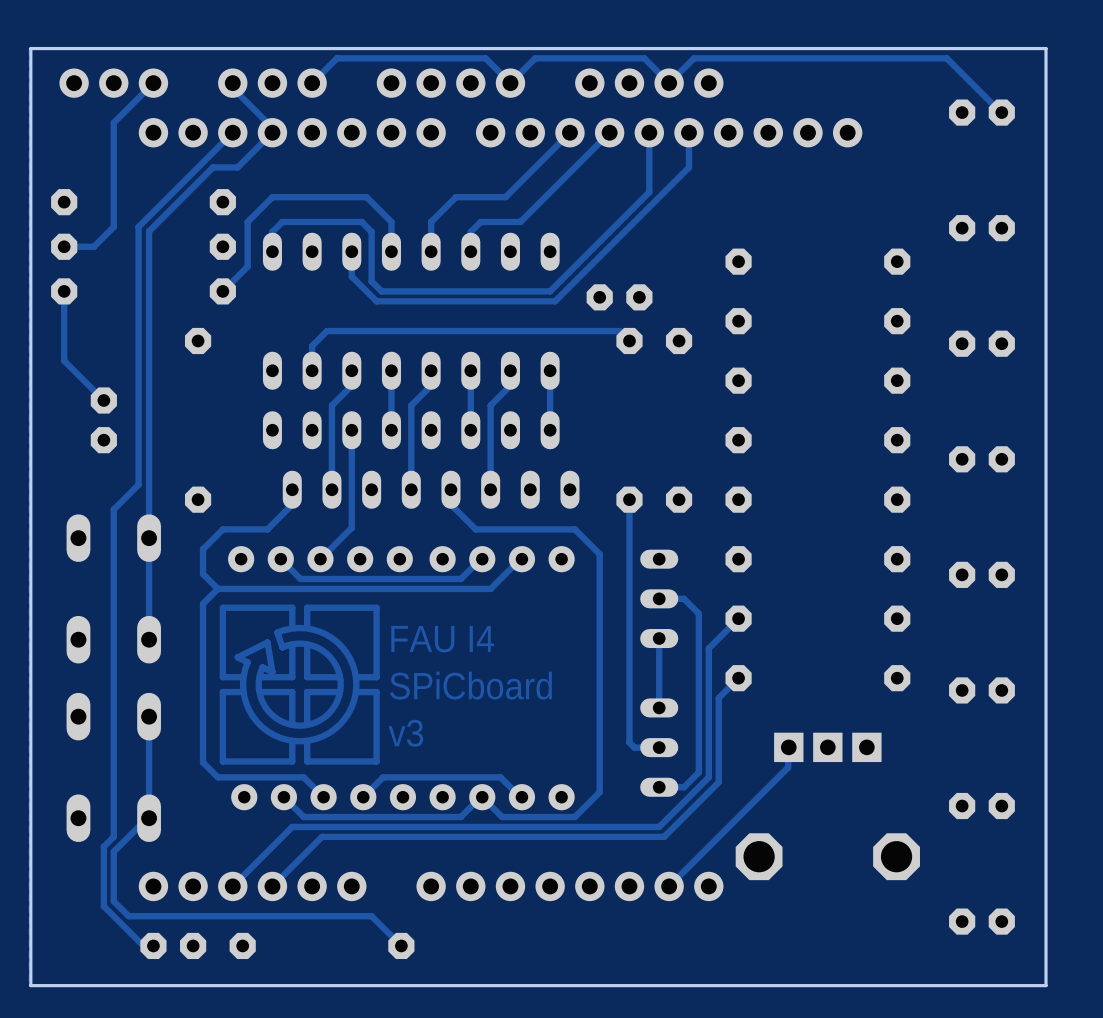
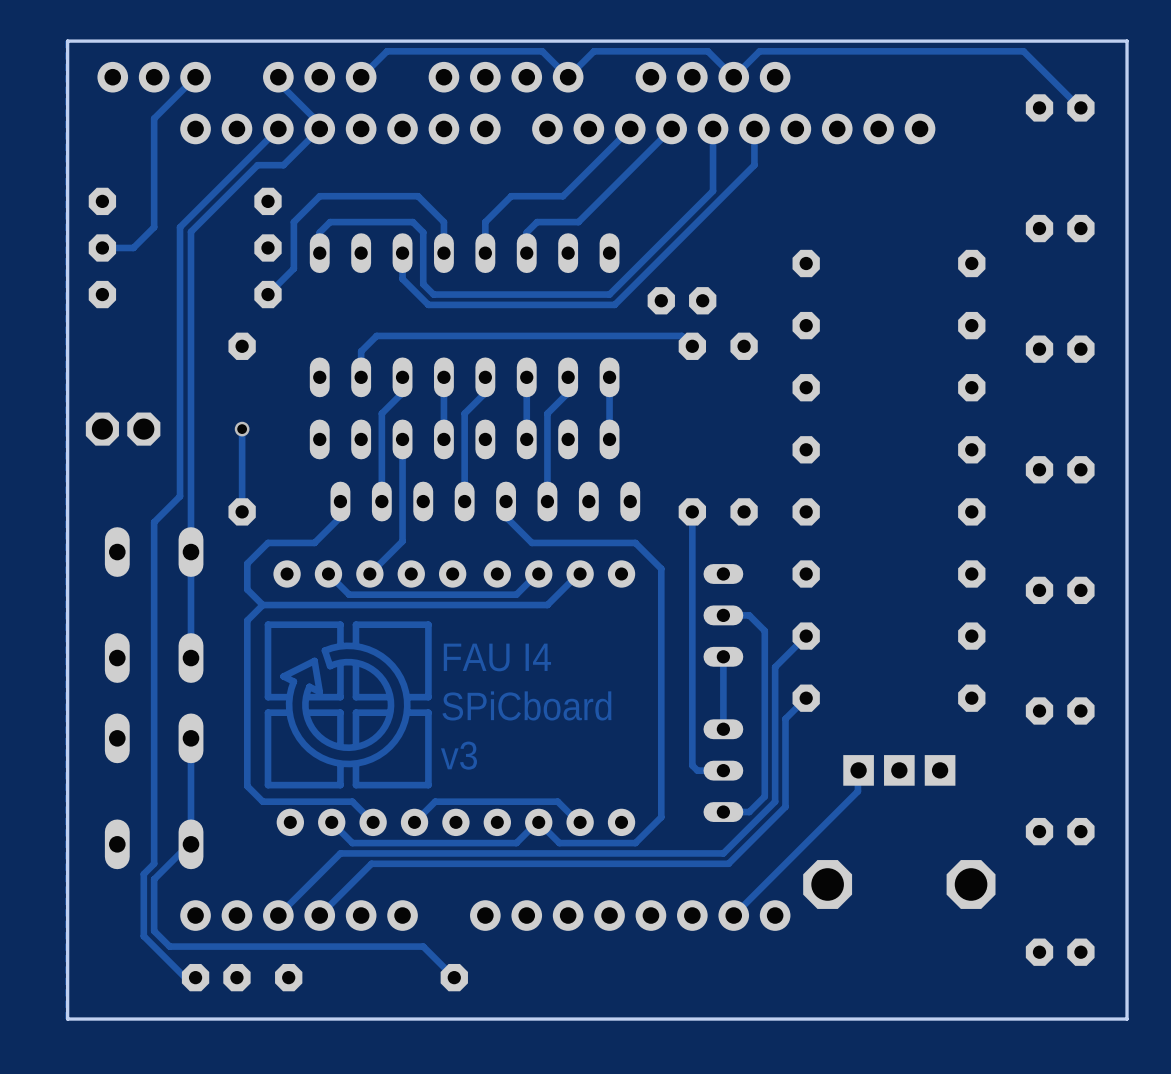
track: (64, 291) (64, 360) (103, 400) -> none
part: none -> (123, 429)
part: (103, 420) -> none
track: none -> (242, 429) (242, 511)
via: none -> (242, 429)

